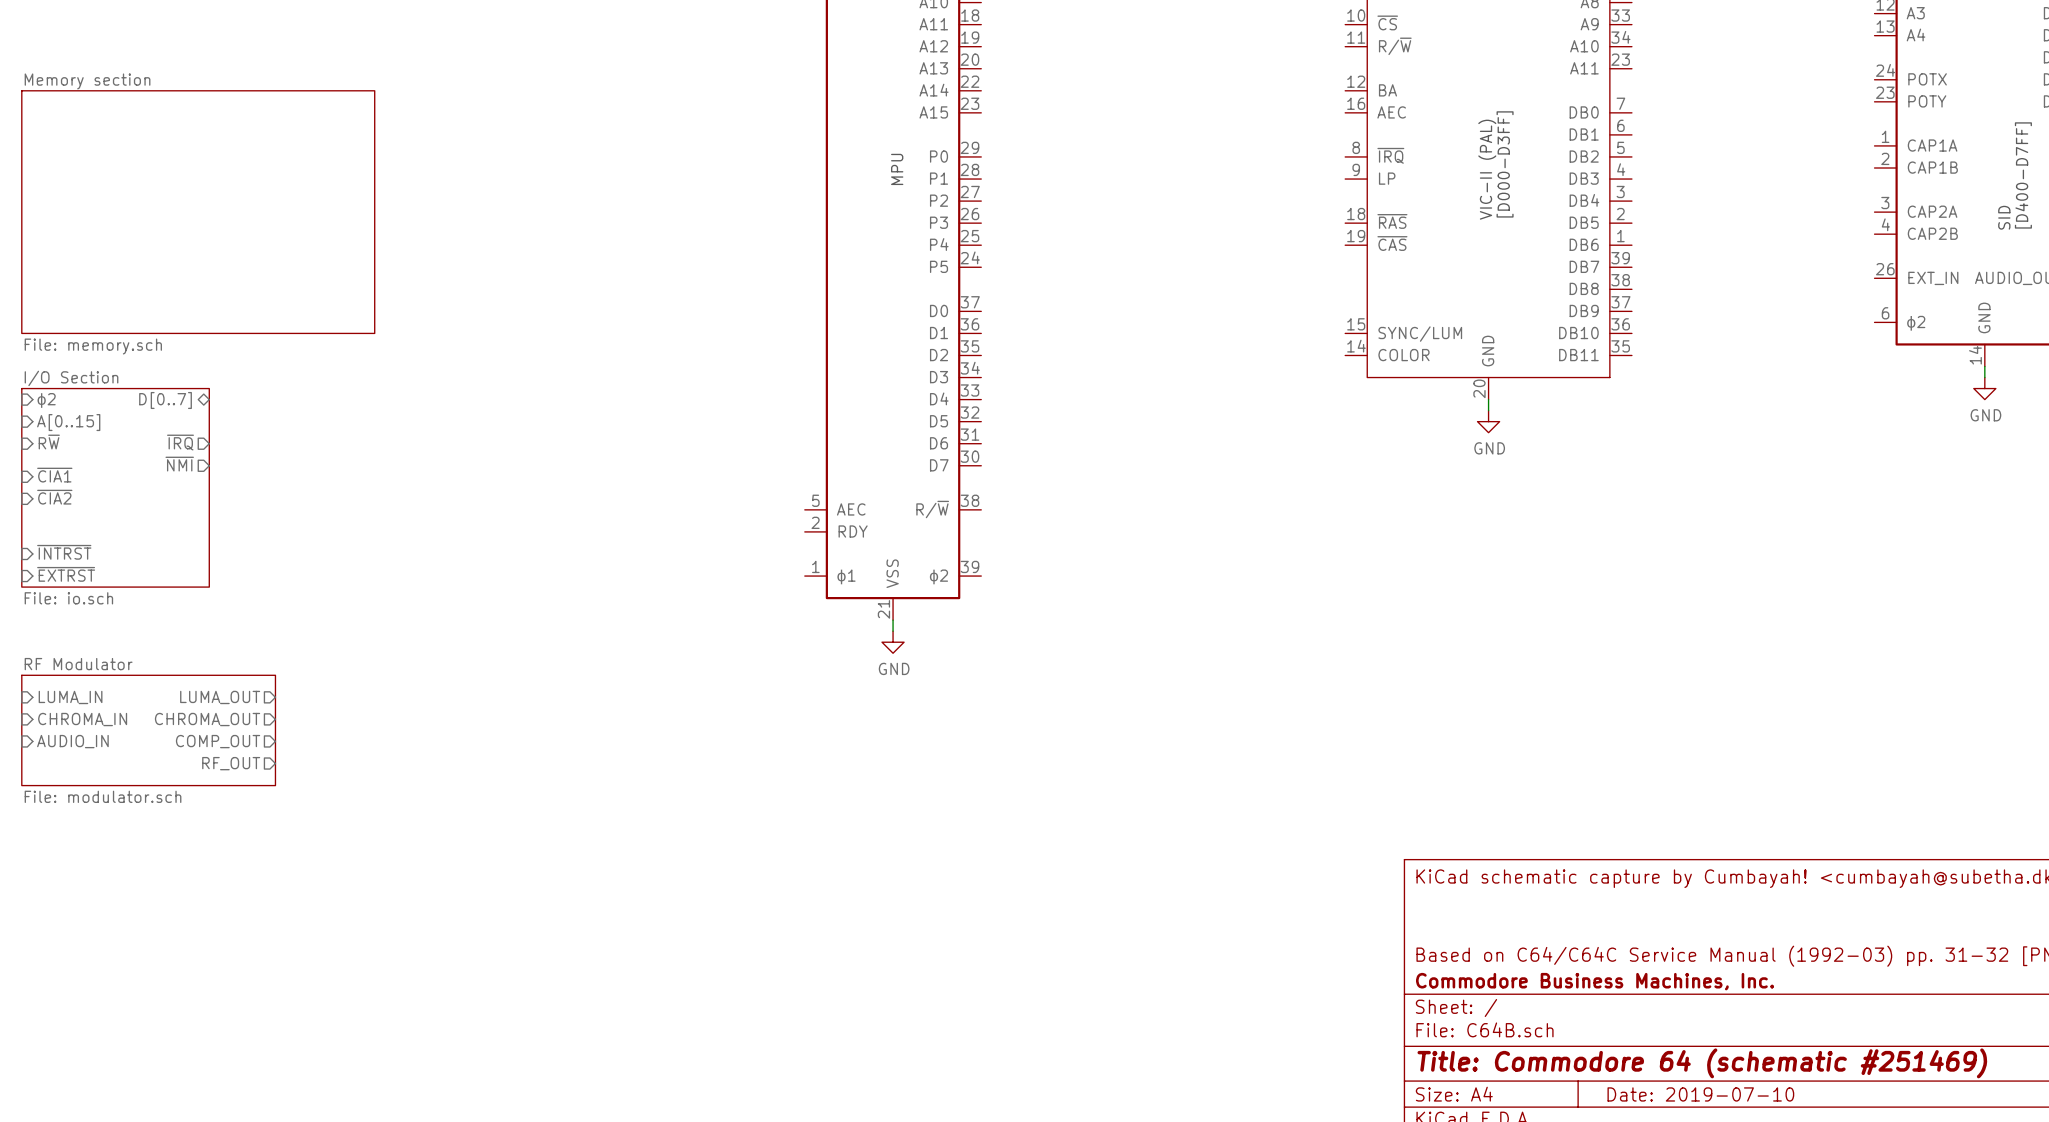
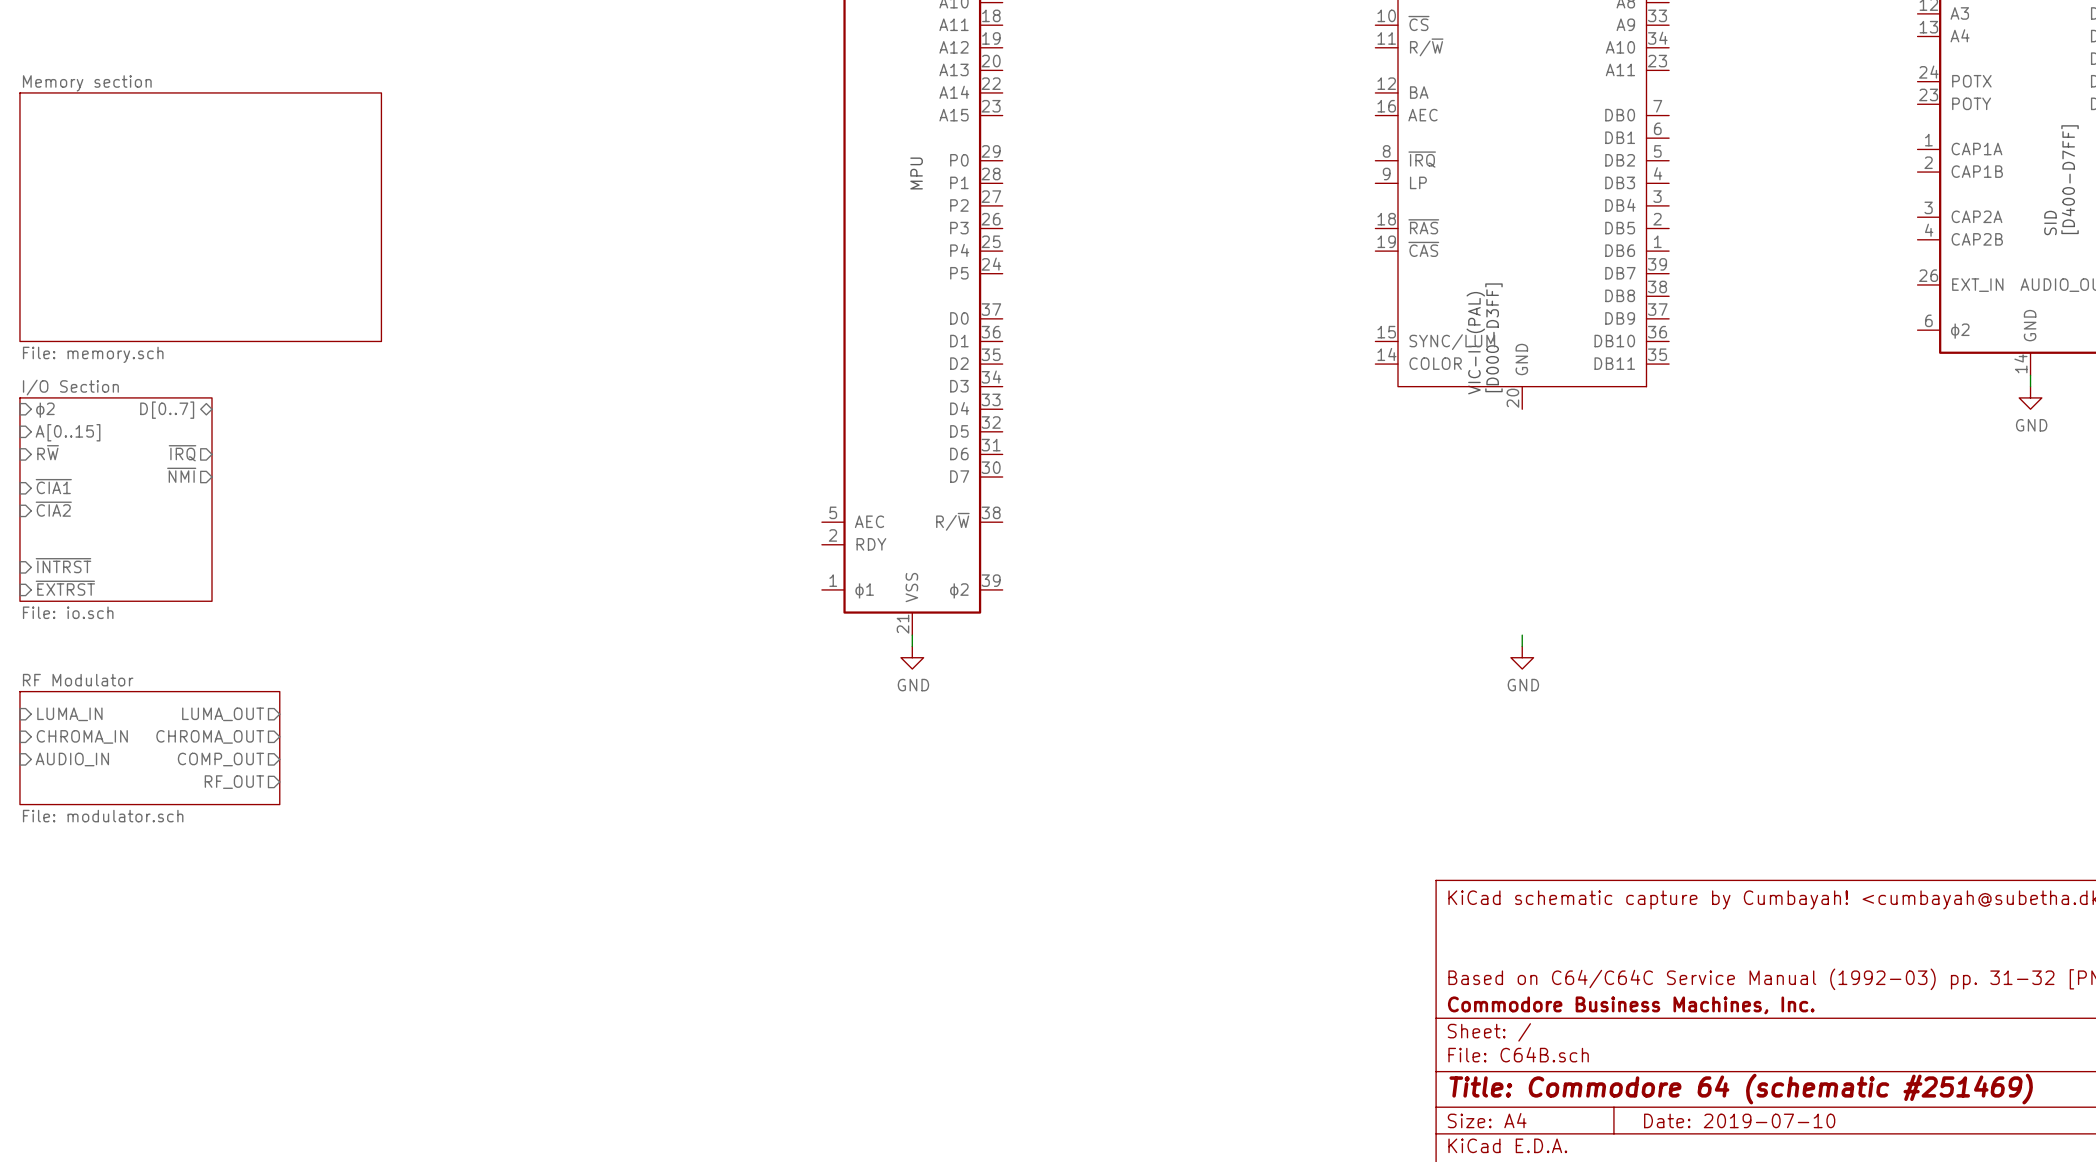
text position: [D000-D3FF] (1505, 164) -> [D000-D3FF] (1493, 337)
text position: VIC-II (PAL) (1487, 169) -> VIC-II (PAL) (1475, 343)
wire: (1488, 399) (1488, 410) -> none
power symbol: GND (1488, 421) -> none
wire: none -> (1522, 635) (1522, 646)
power symbol: none -> GND (1522, 657)

